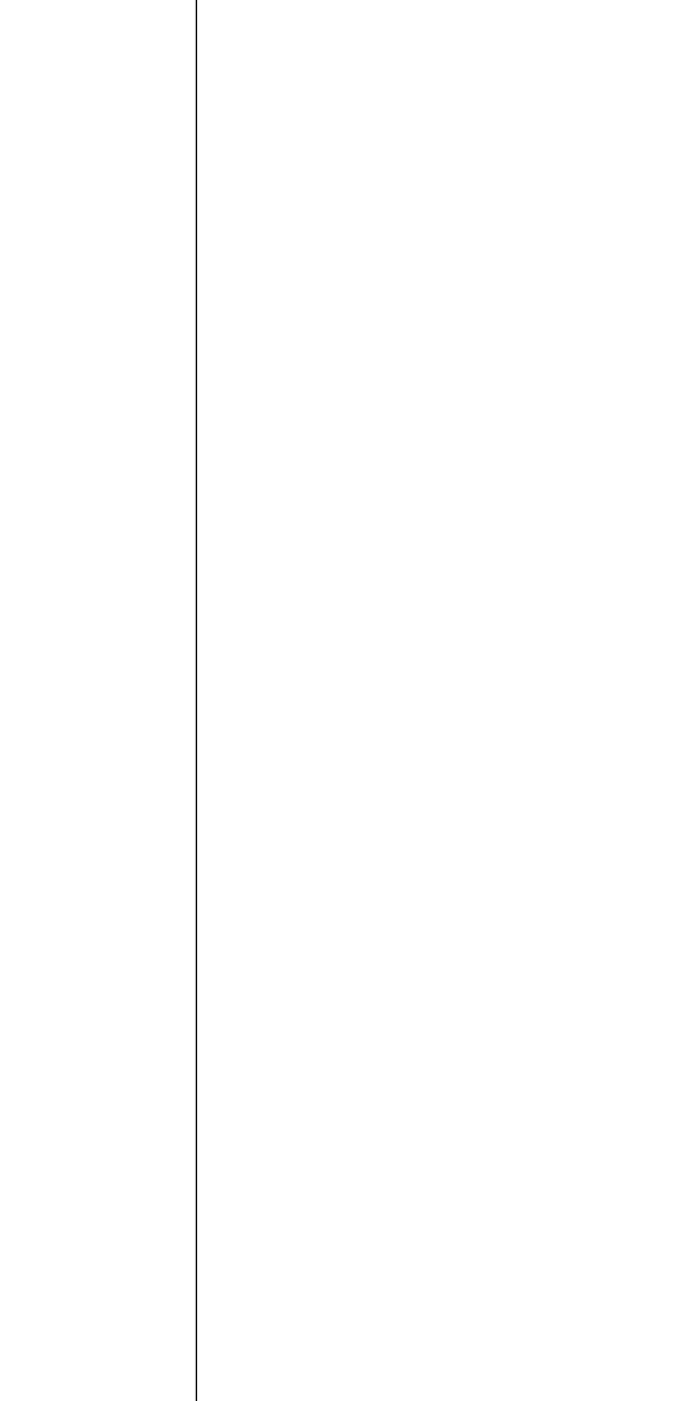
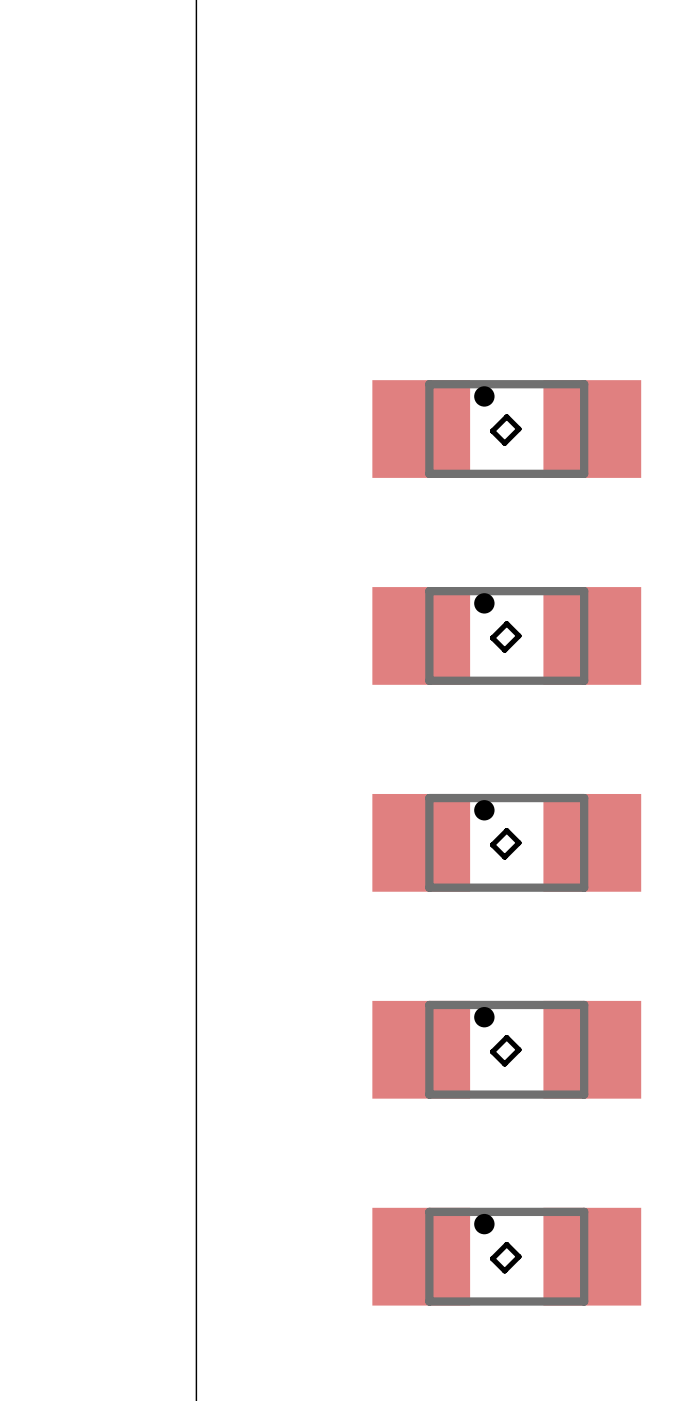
part: none -> (506, 429)
part: none -> (506, 635)
part: none -> (506, 842)
part: none -> (506, 1049)
part: none -> (506, 1256)

